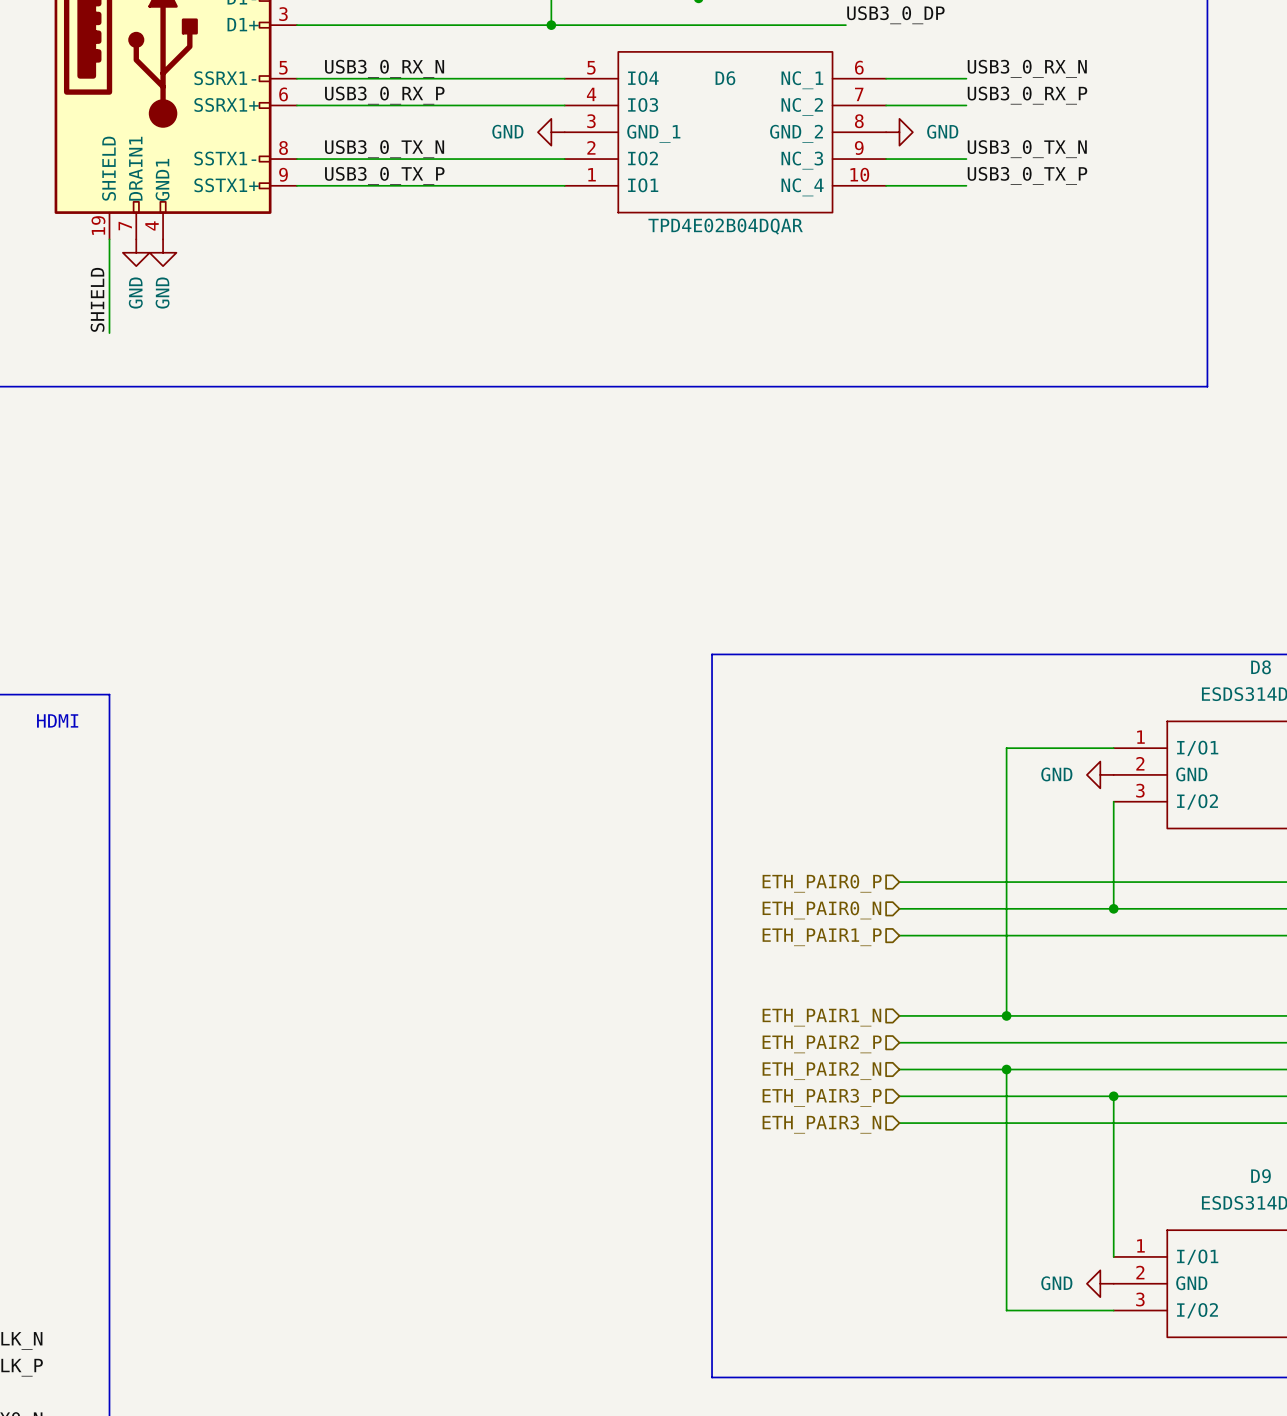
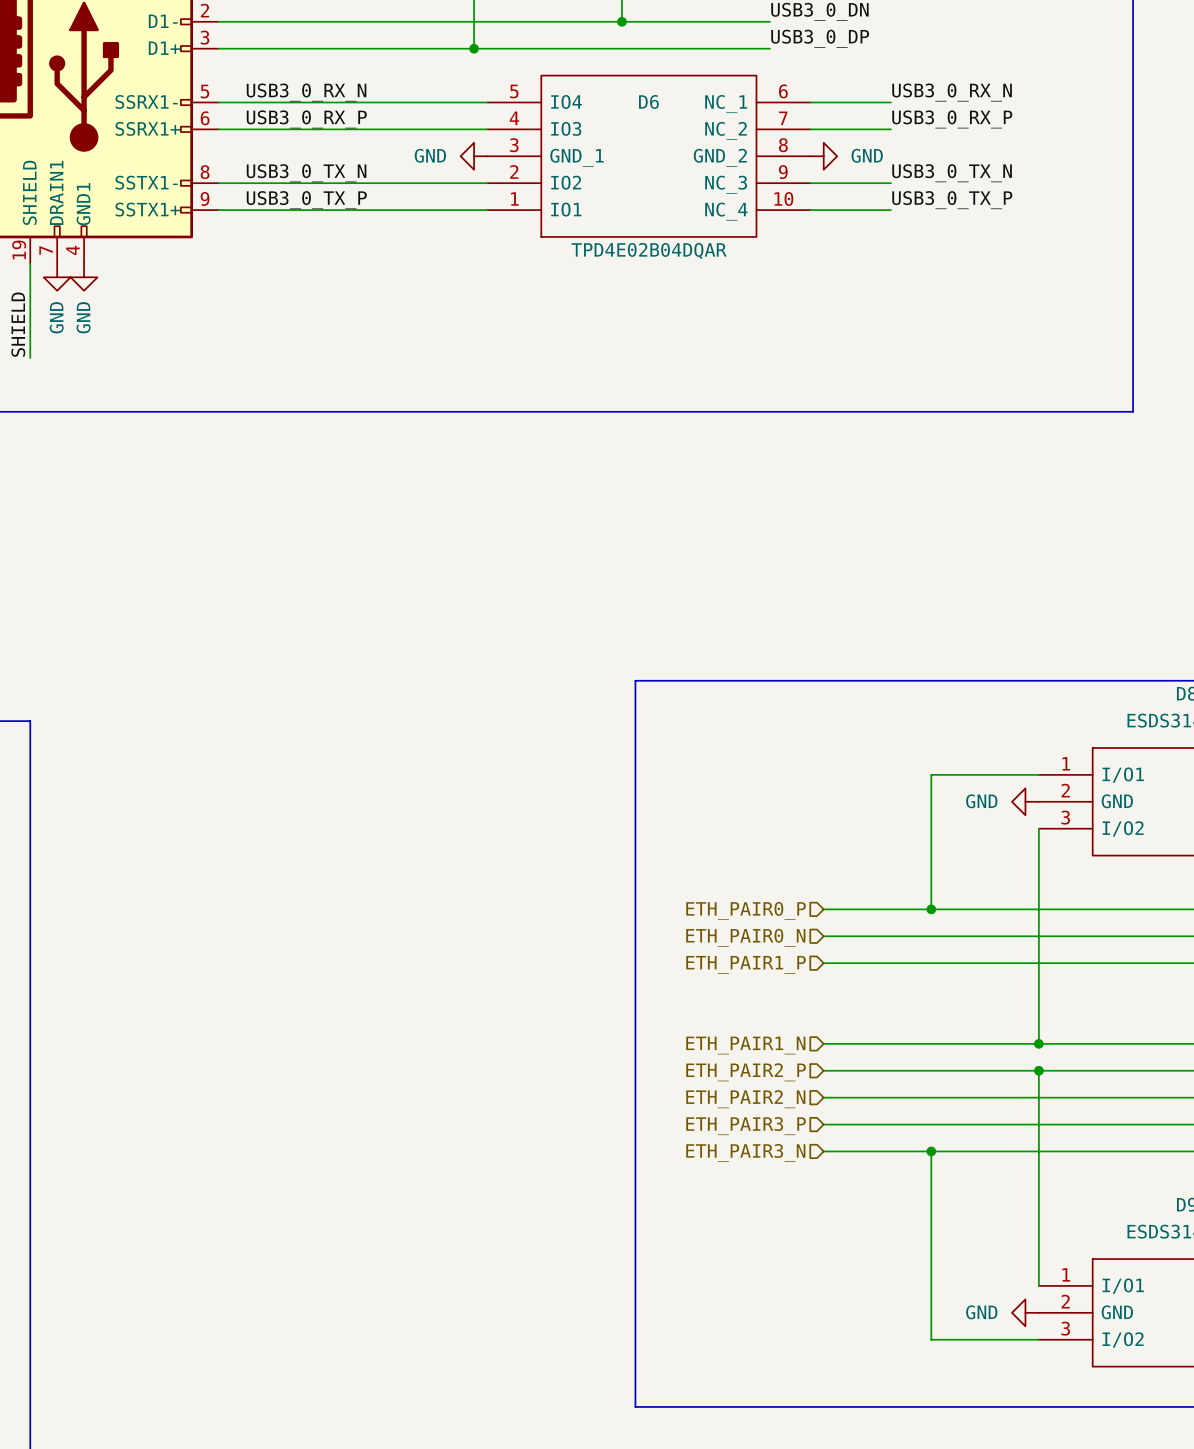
wire: (1006, 882) (1006, 1015) -> none
junction: none -> (931, 909)
wire: none -> (1038, 936) (1038, 1043)
junction: (1113, 908) -> none
junction: (1006, 1015) -> none
junction: none -> (1038, 1043)
junction: none -> (1038, 1070)
wire: (1006, 1069) (1006, 1123) -> (1038, 1070) (1038, 1124)
junction: (1006, 1069) -> none
junction: (1113, 1096) -> none
junction: none -> (931, 1151)

